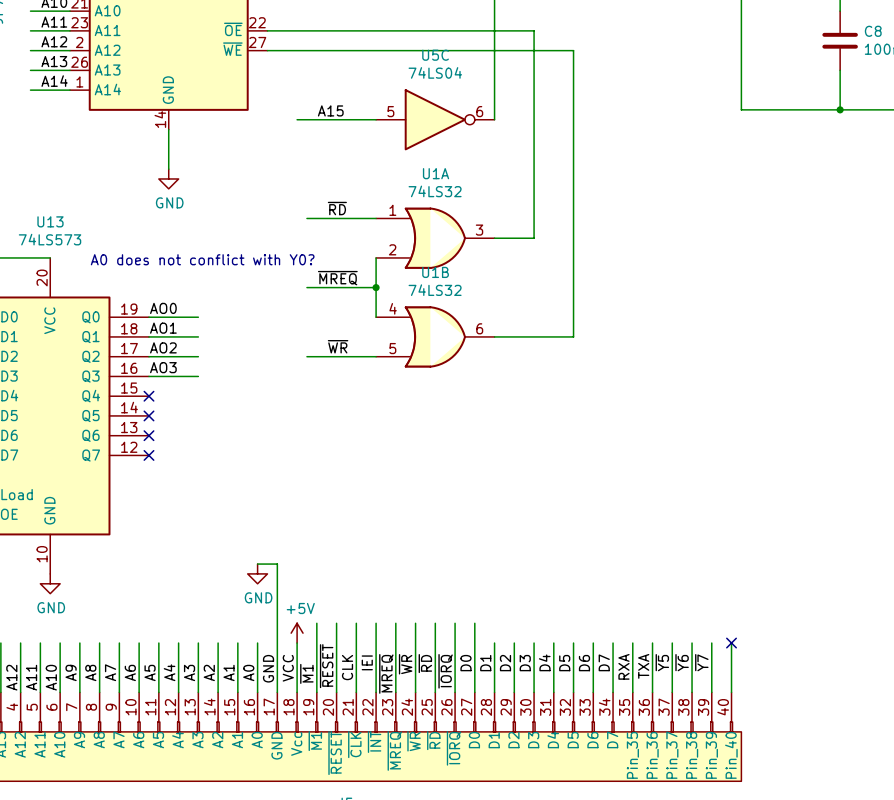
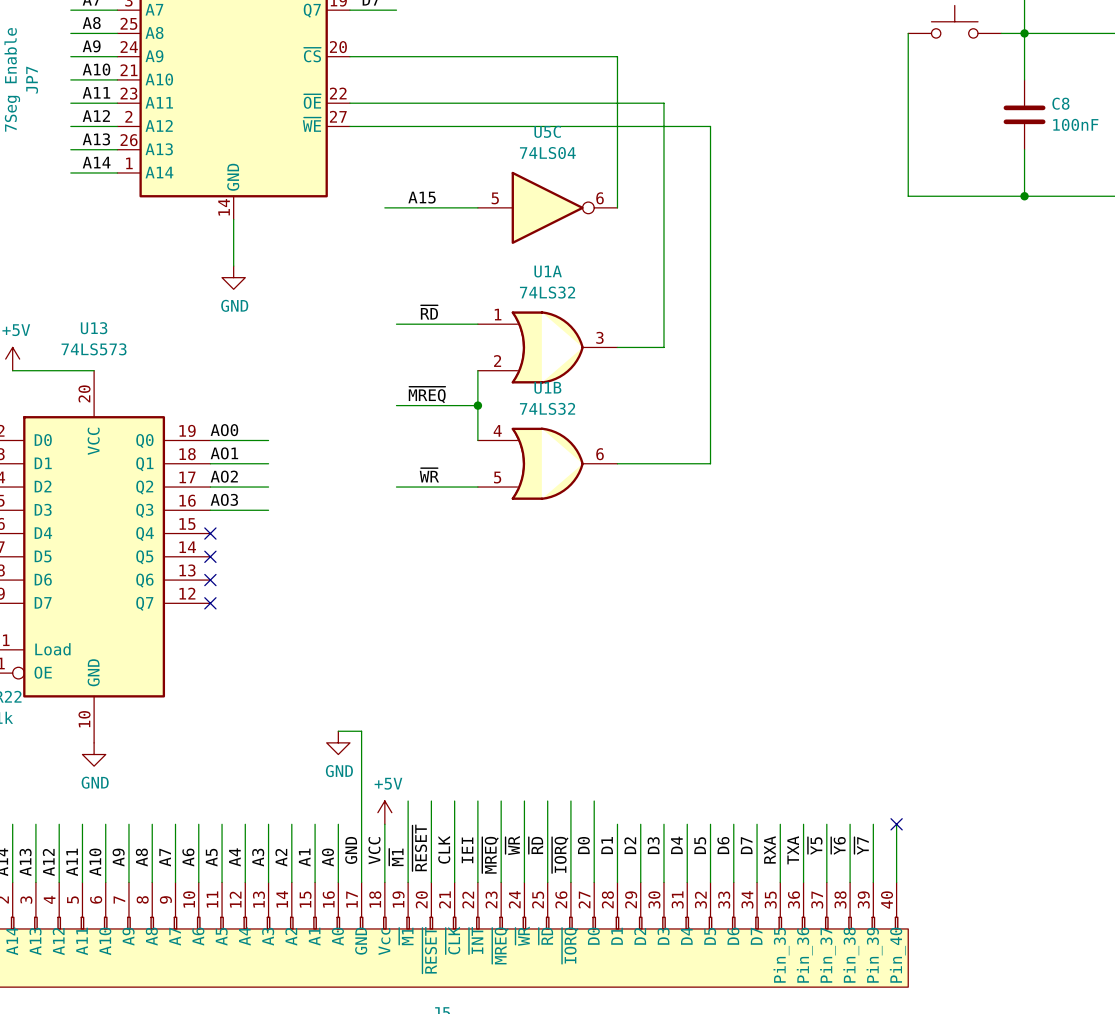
text: A0 does not conflict with Y0? (202, 259) -> none

